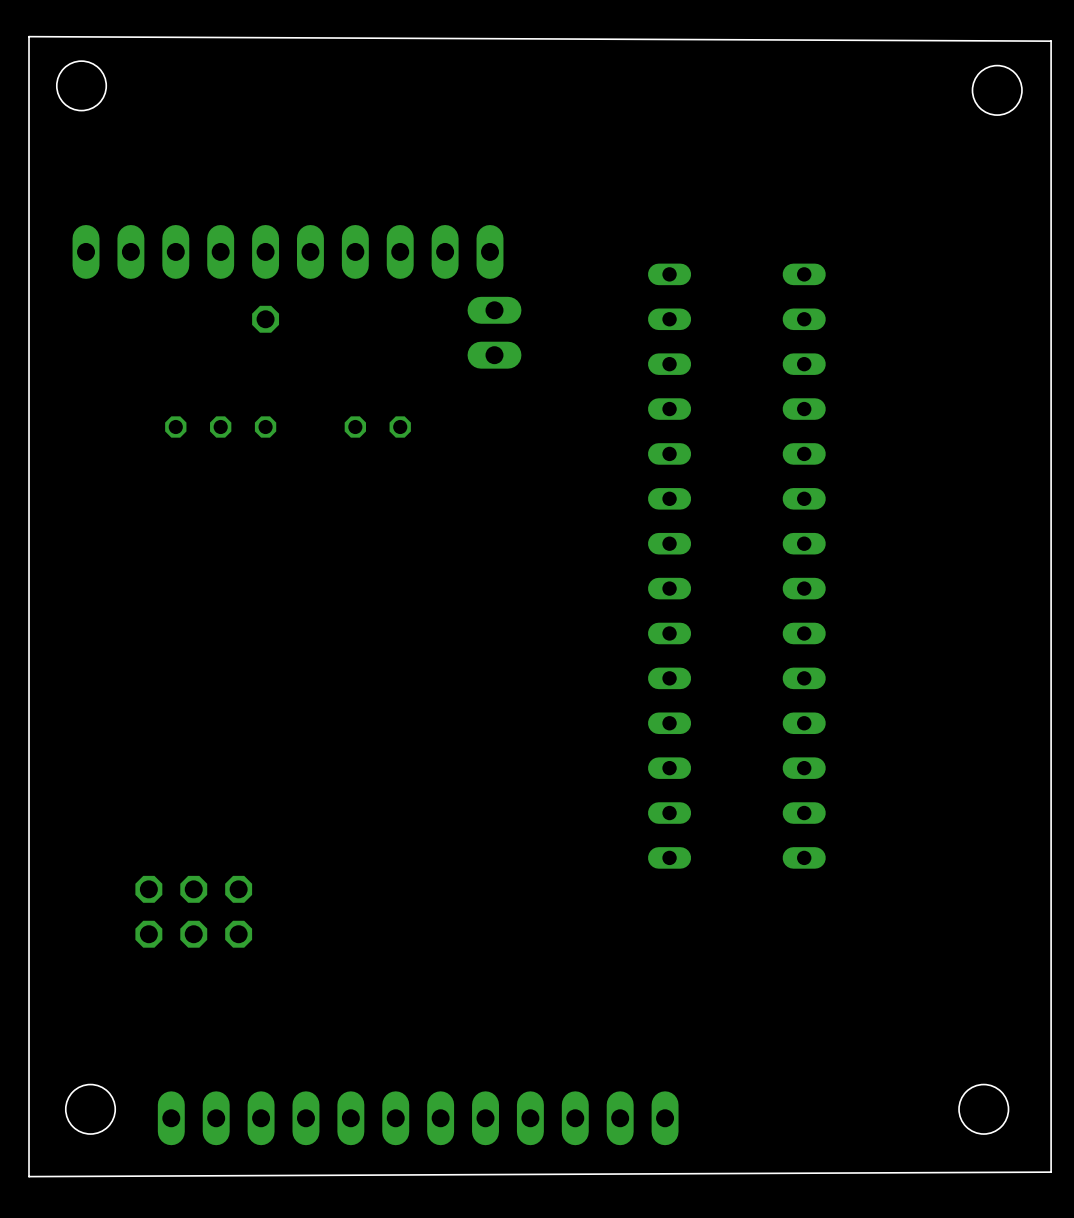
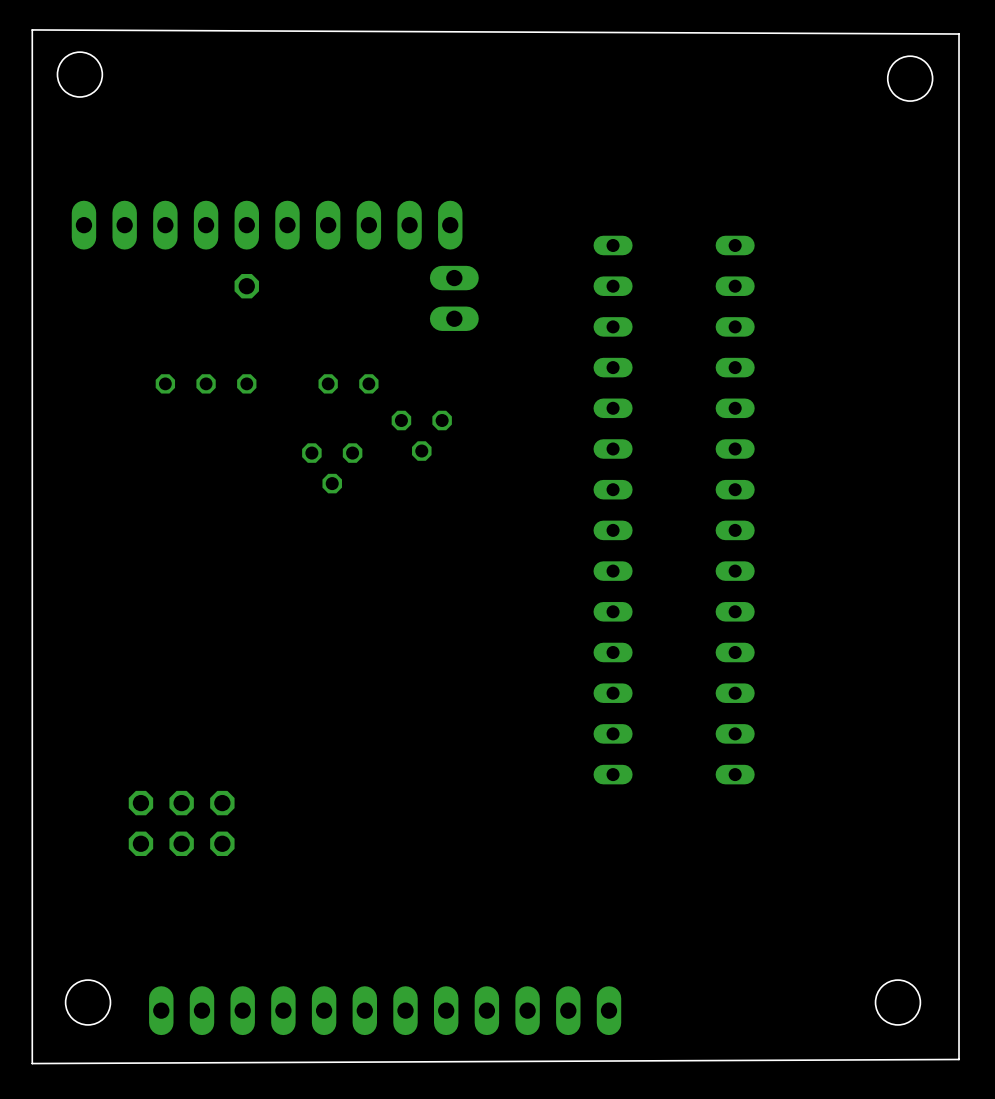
part: none -> (421, 435)
part: none -> (332, 468)

